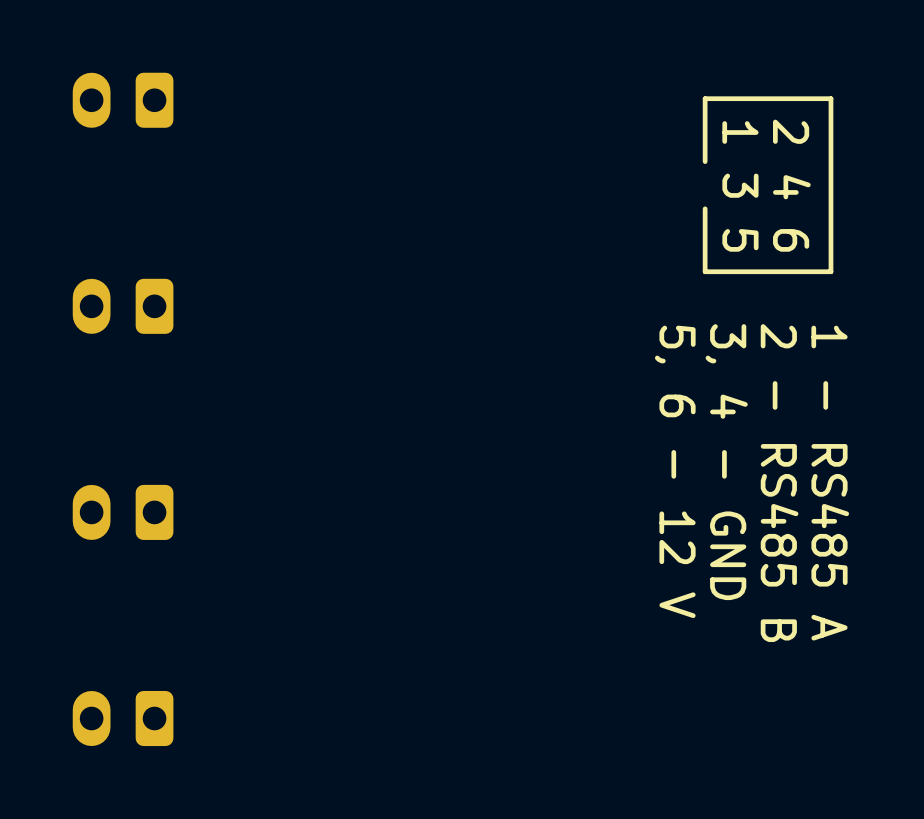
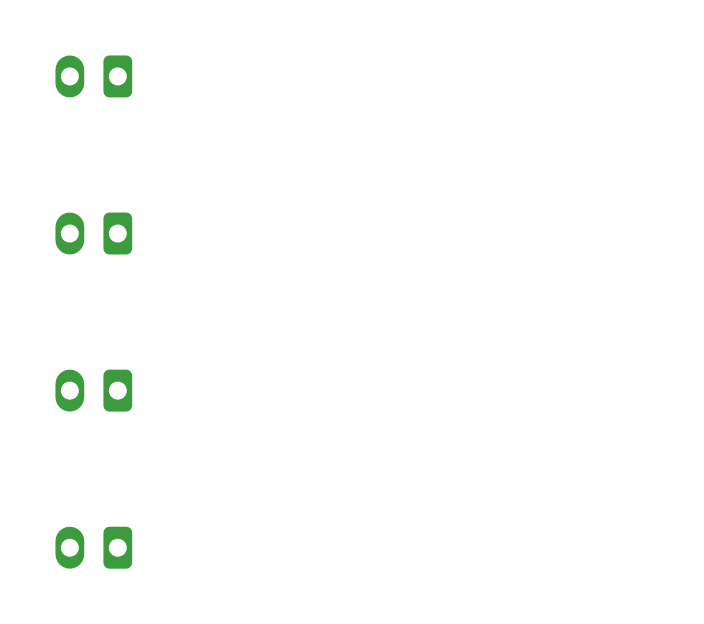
line: (705, 161) (705, 98) (830, 98) (830, 271) (705, 271) (705, 208) -> none
text: 2 4 6 (791, 185) -> none
text: 1 3 5 (740, 186) -> none
text: 3, 4 - GND (726, 462) -> none
text: 5, 6 - 12 V (675, 471) -> none
text: 2 - RS485 B (779, 483) -> none
text: 1 - RS485 A (830, 483) -> none

